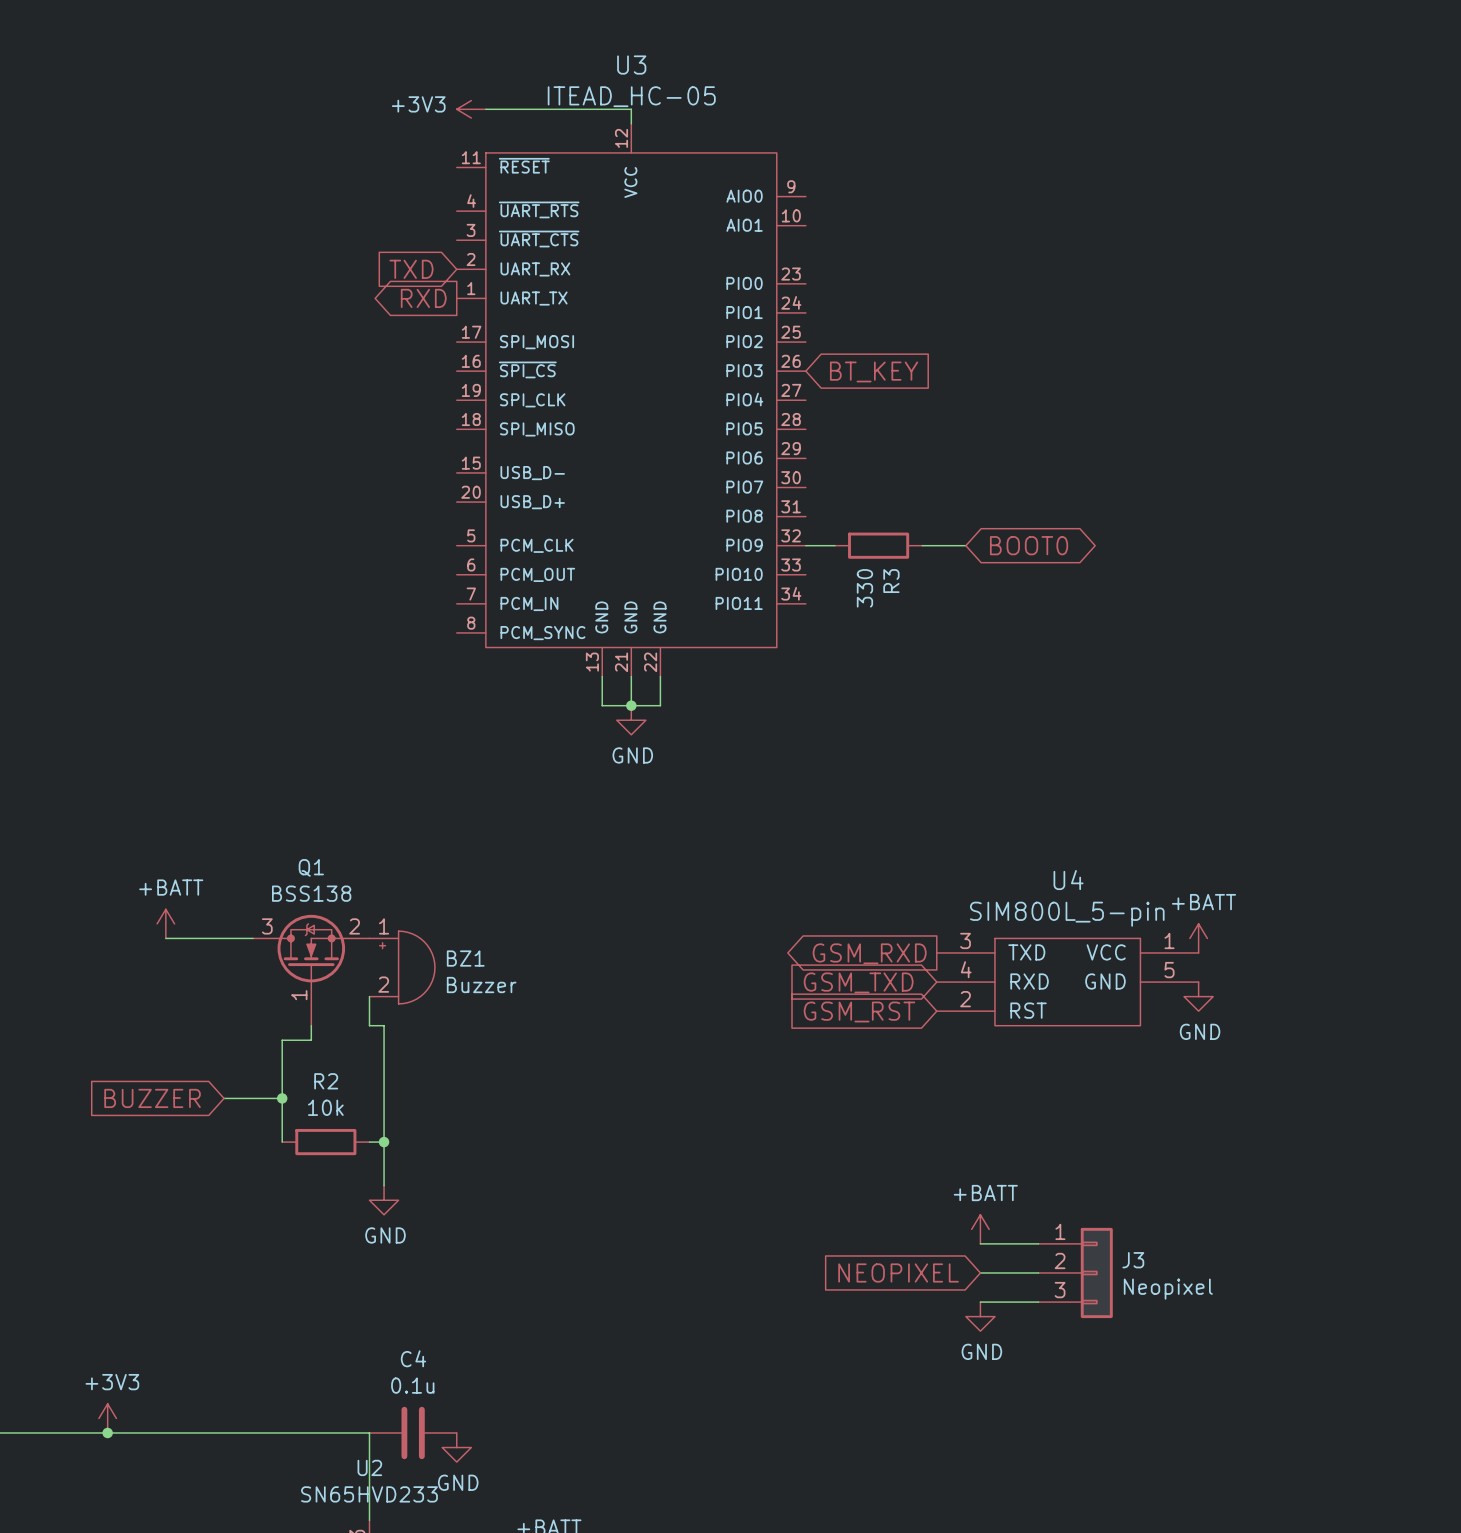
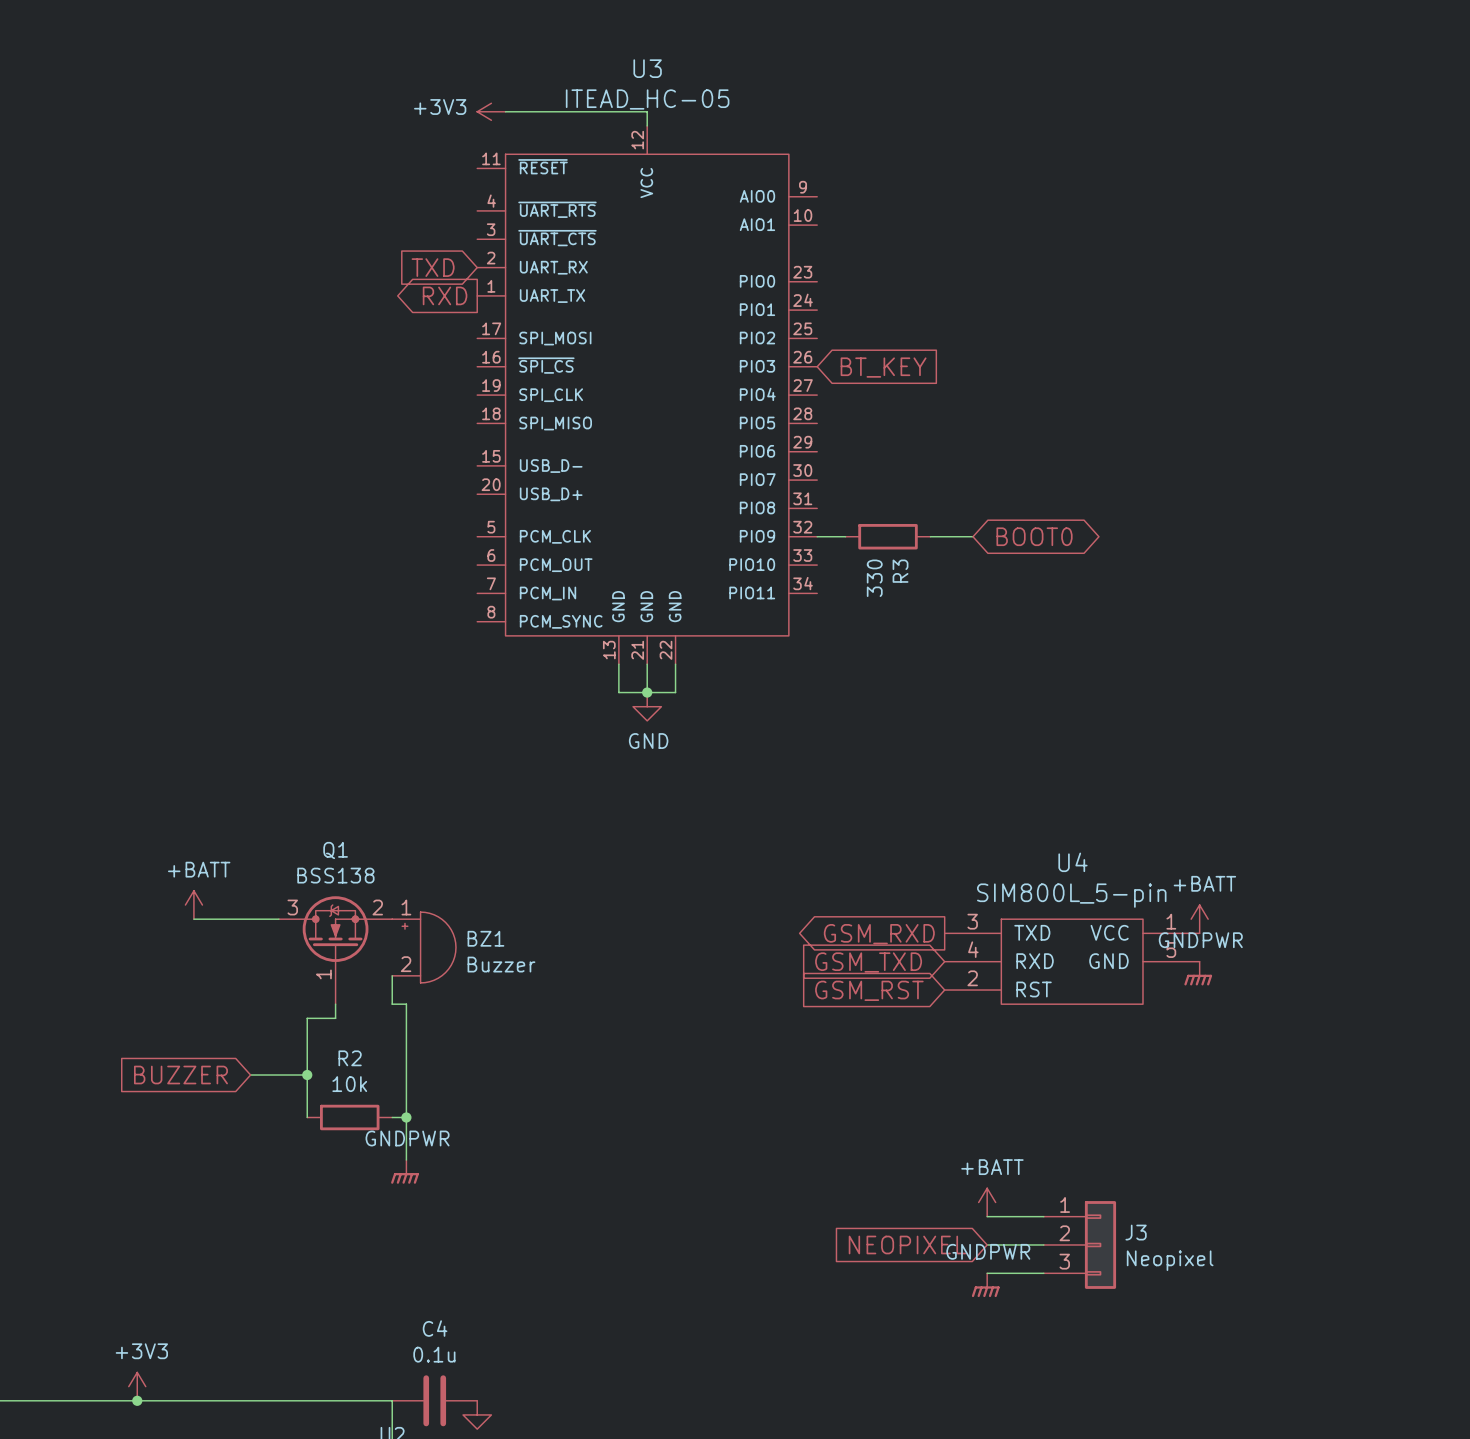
power symbol: GND (1198, 996) -> GNDPWR (1198, 973)
power symbol: GND (384, 1200) -> GNDPWR (404, 1171)
power symbol: GND (980, 1316) -> GNDPWR (985, 1285)

